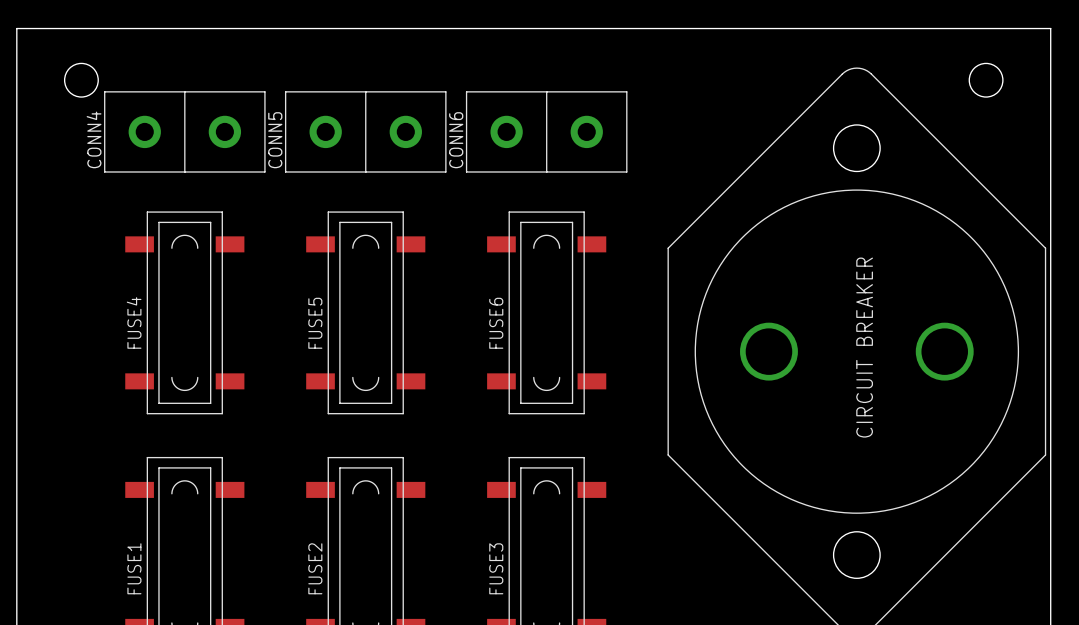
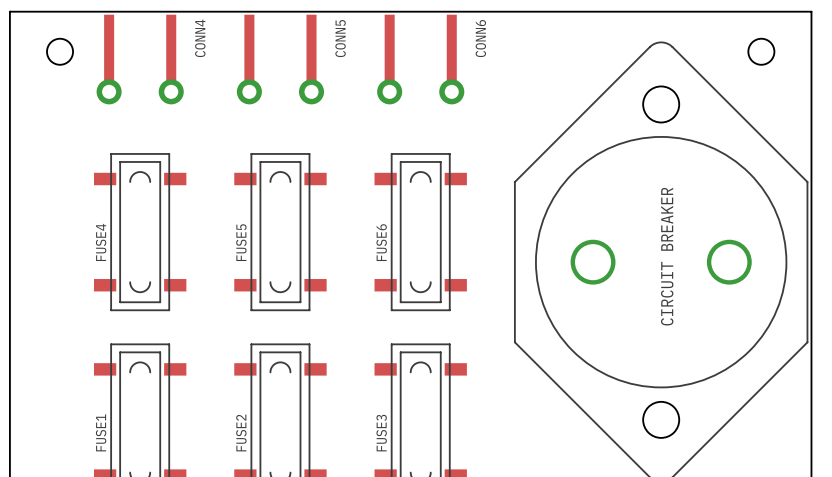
CONN4 footprint: [104, 91, 266, 173] -> [96, 14, 184, 105]
CONN5 footprint: [284, 91, 447, 173] -> [236, 14, 325, 105]
CONN6 footprint: [465, 91, 628, 173] -> [377, 14, 465, 105]
CONN4 name position: CONN4 (94, 139) -> CONN4 (200, 38)
CONN5 name position: CONN5 (275, 140) -> CONN5 (340, 38)
CONN6 name position: CONN6 (456, 140) -> CONN6 (480, 38)

